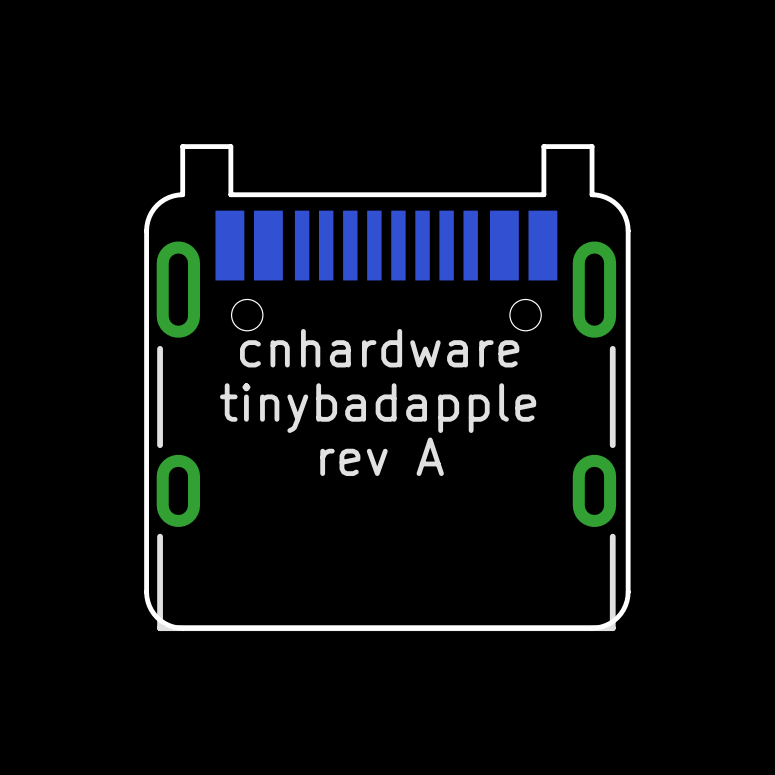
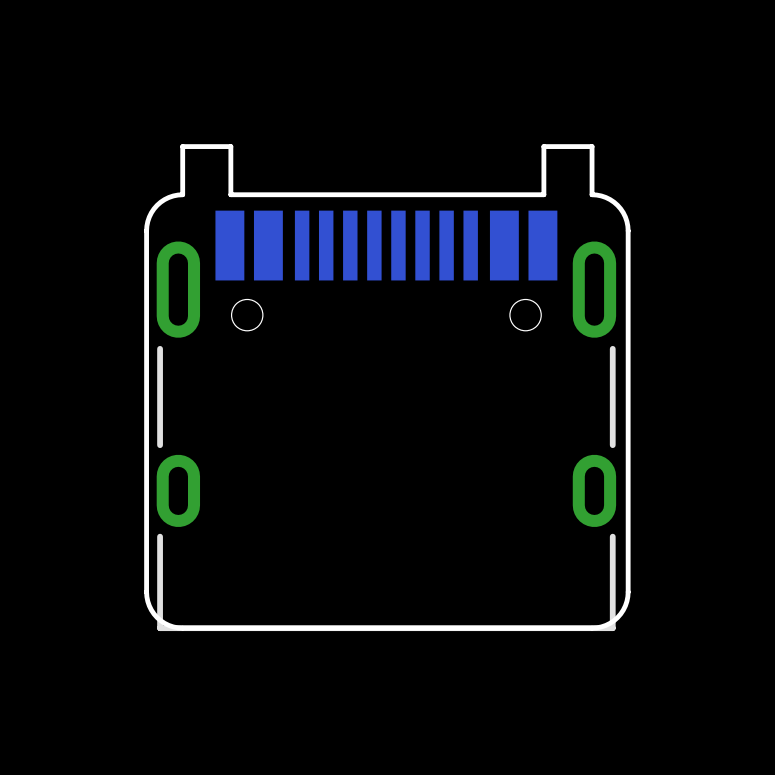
text: cnhardware (379, 348) -> none
text: tinybadapple (378, 408) -> none
text: rev A (382, 456) -> none

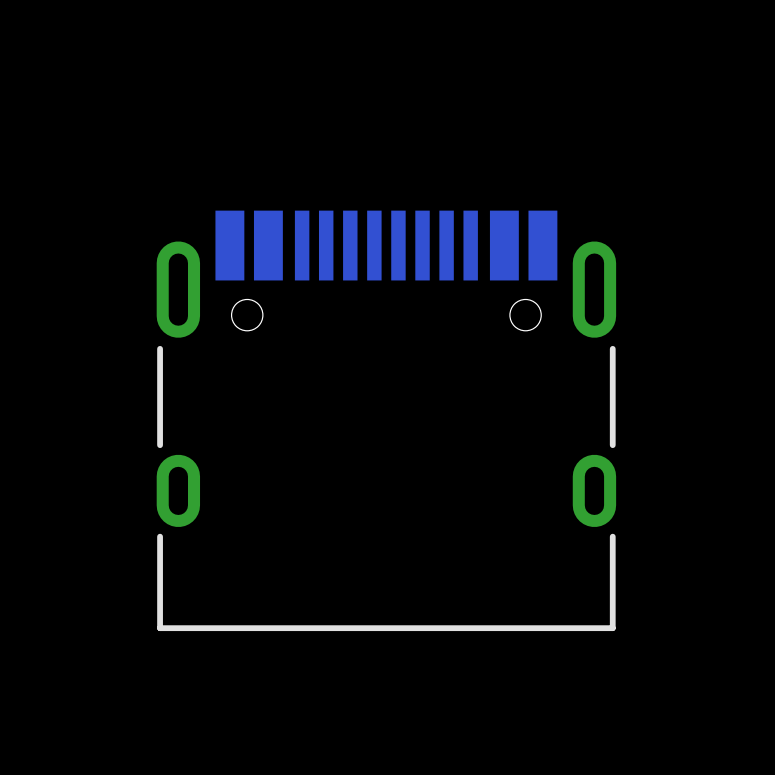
board edge: (592, 146) (592, 194) (605, 197) (617, 205) (625, 217) (628, 230) (628, 592) (625, 605) (617, 617) (605, 625) (592, 628) (182, 628) (168, 625) (157, 617) (149, 605) (146, 592) (146, 230) (149, 217) (157, 205) (168, 197) (182, 194) (182, 146) (230, 146) (230, 194) (543, 194) (543, 146) (592, 146) -> none

